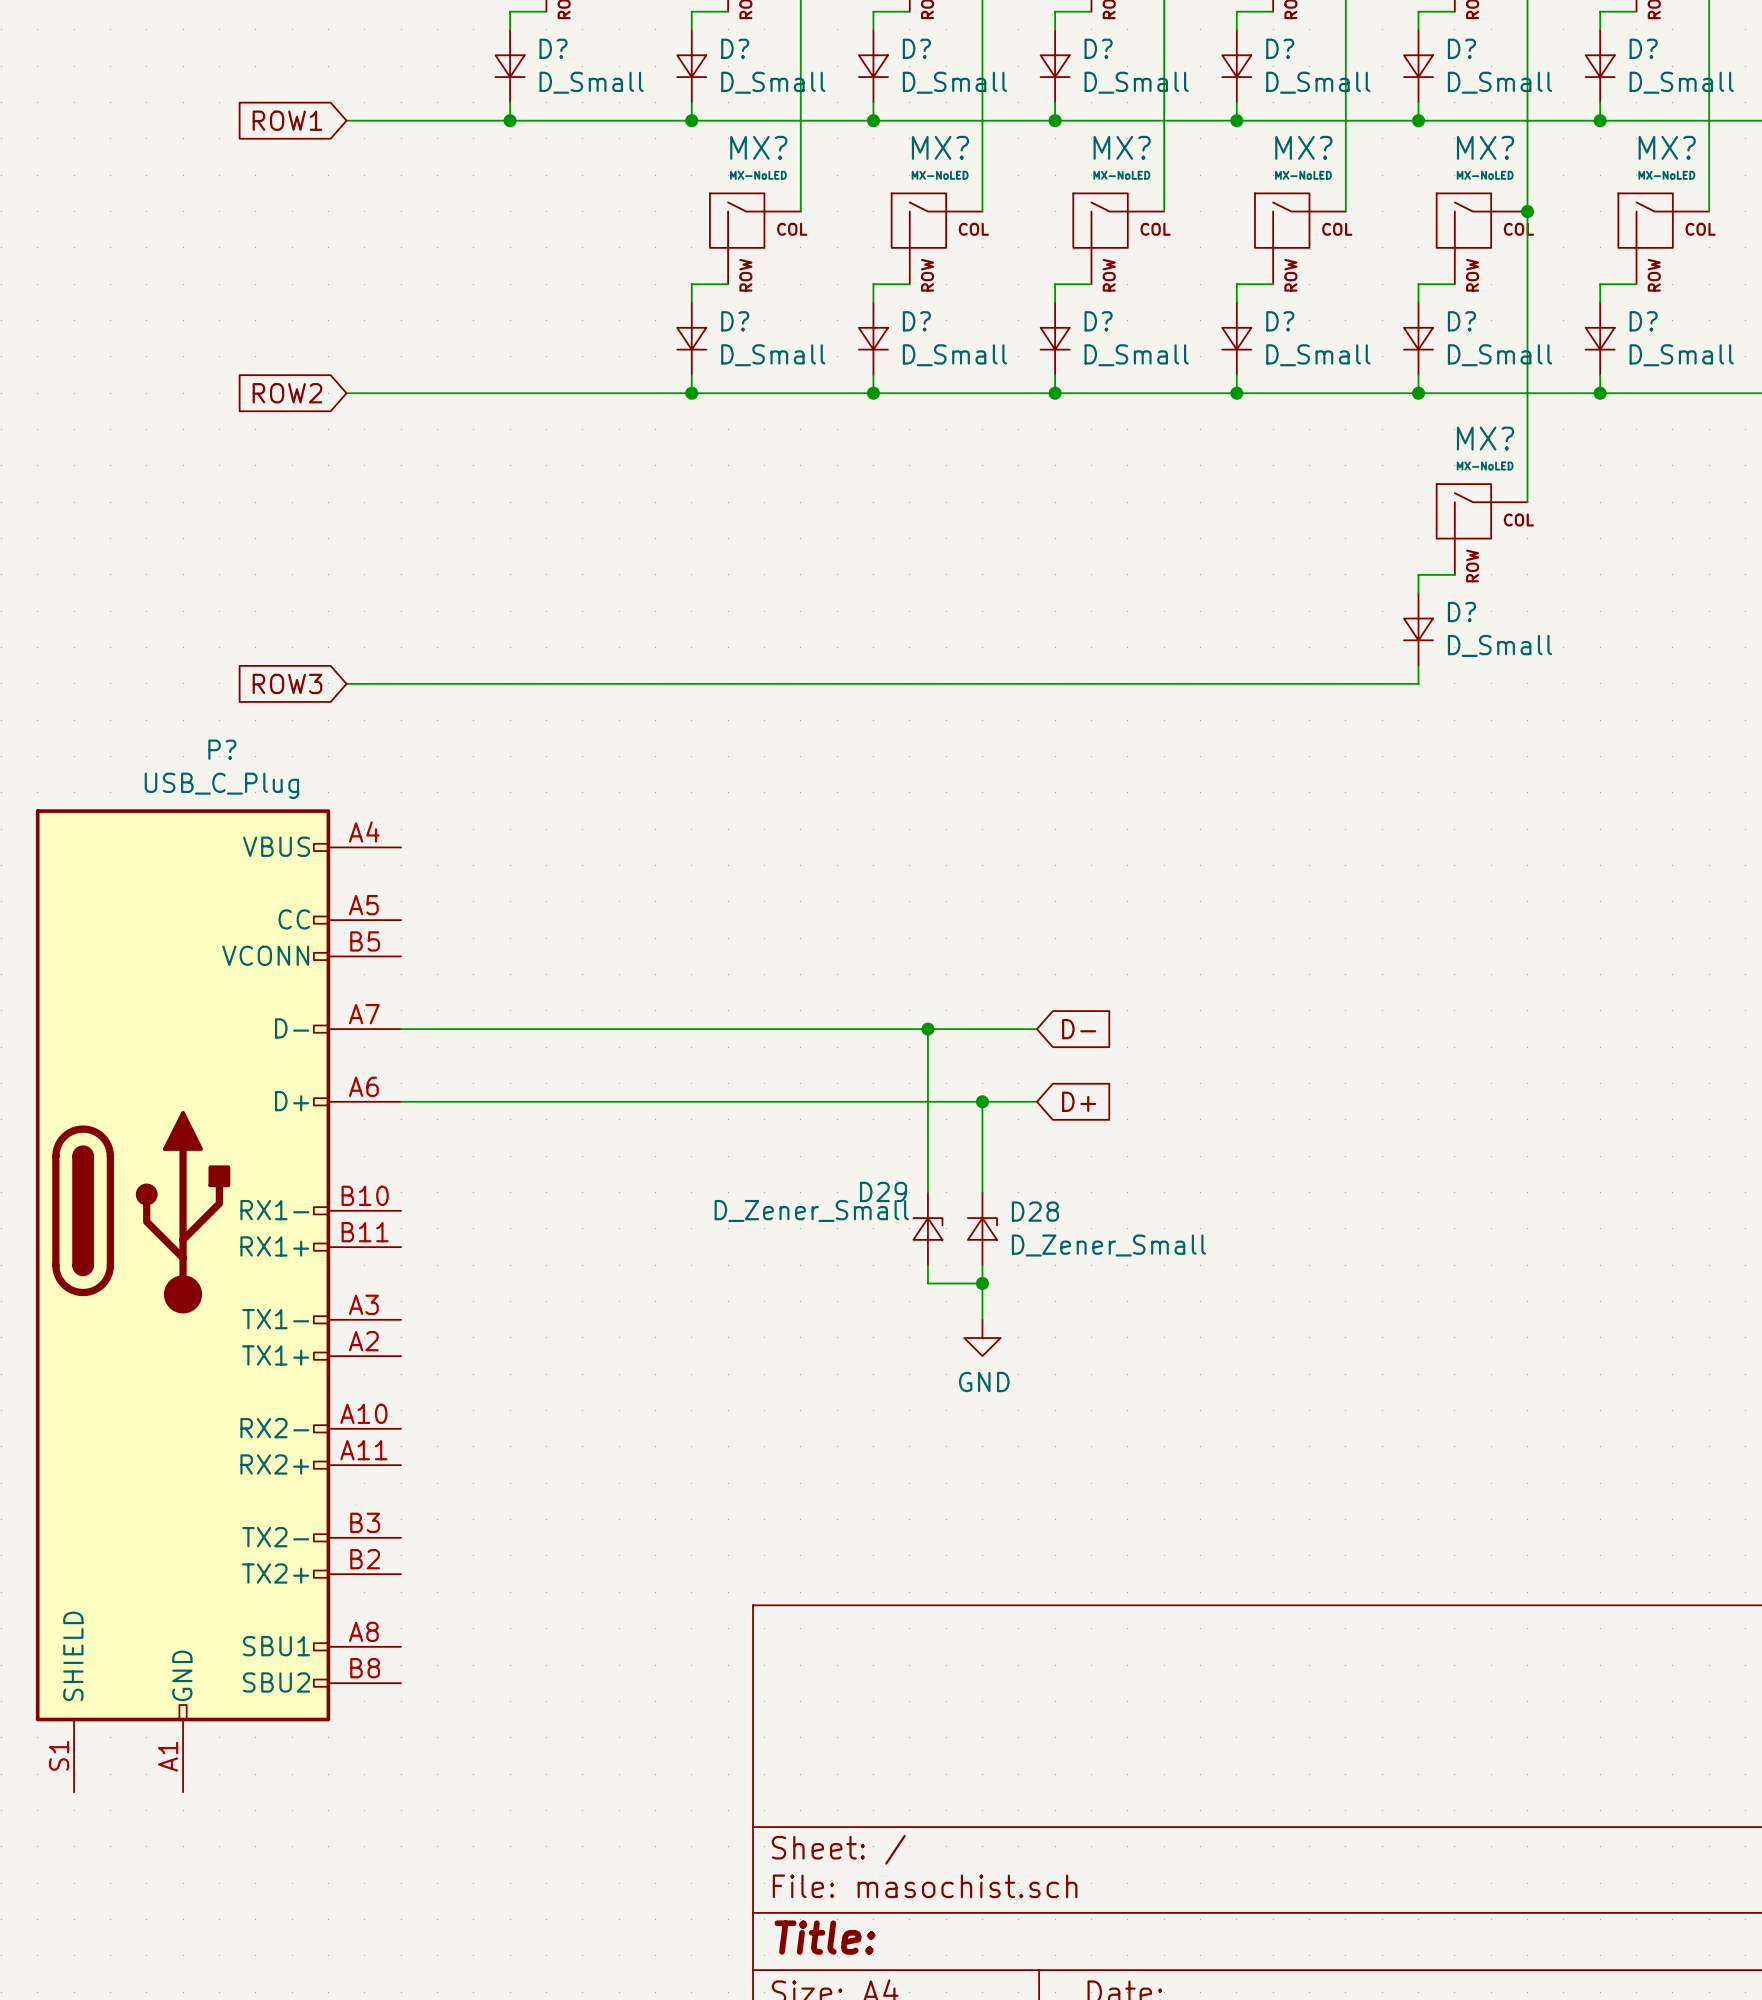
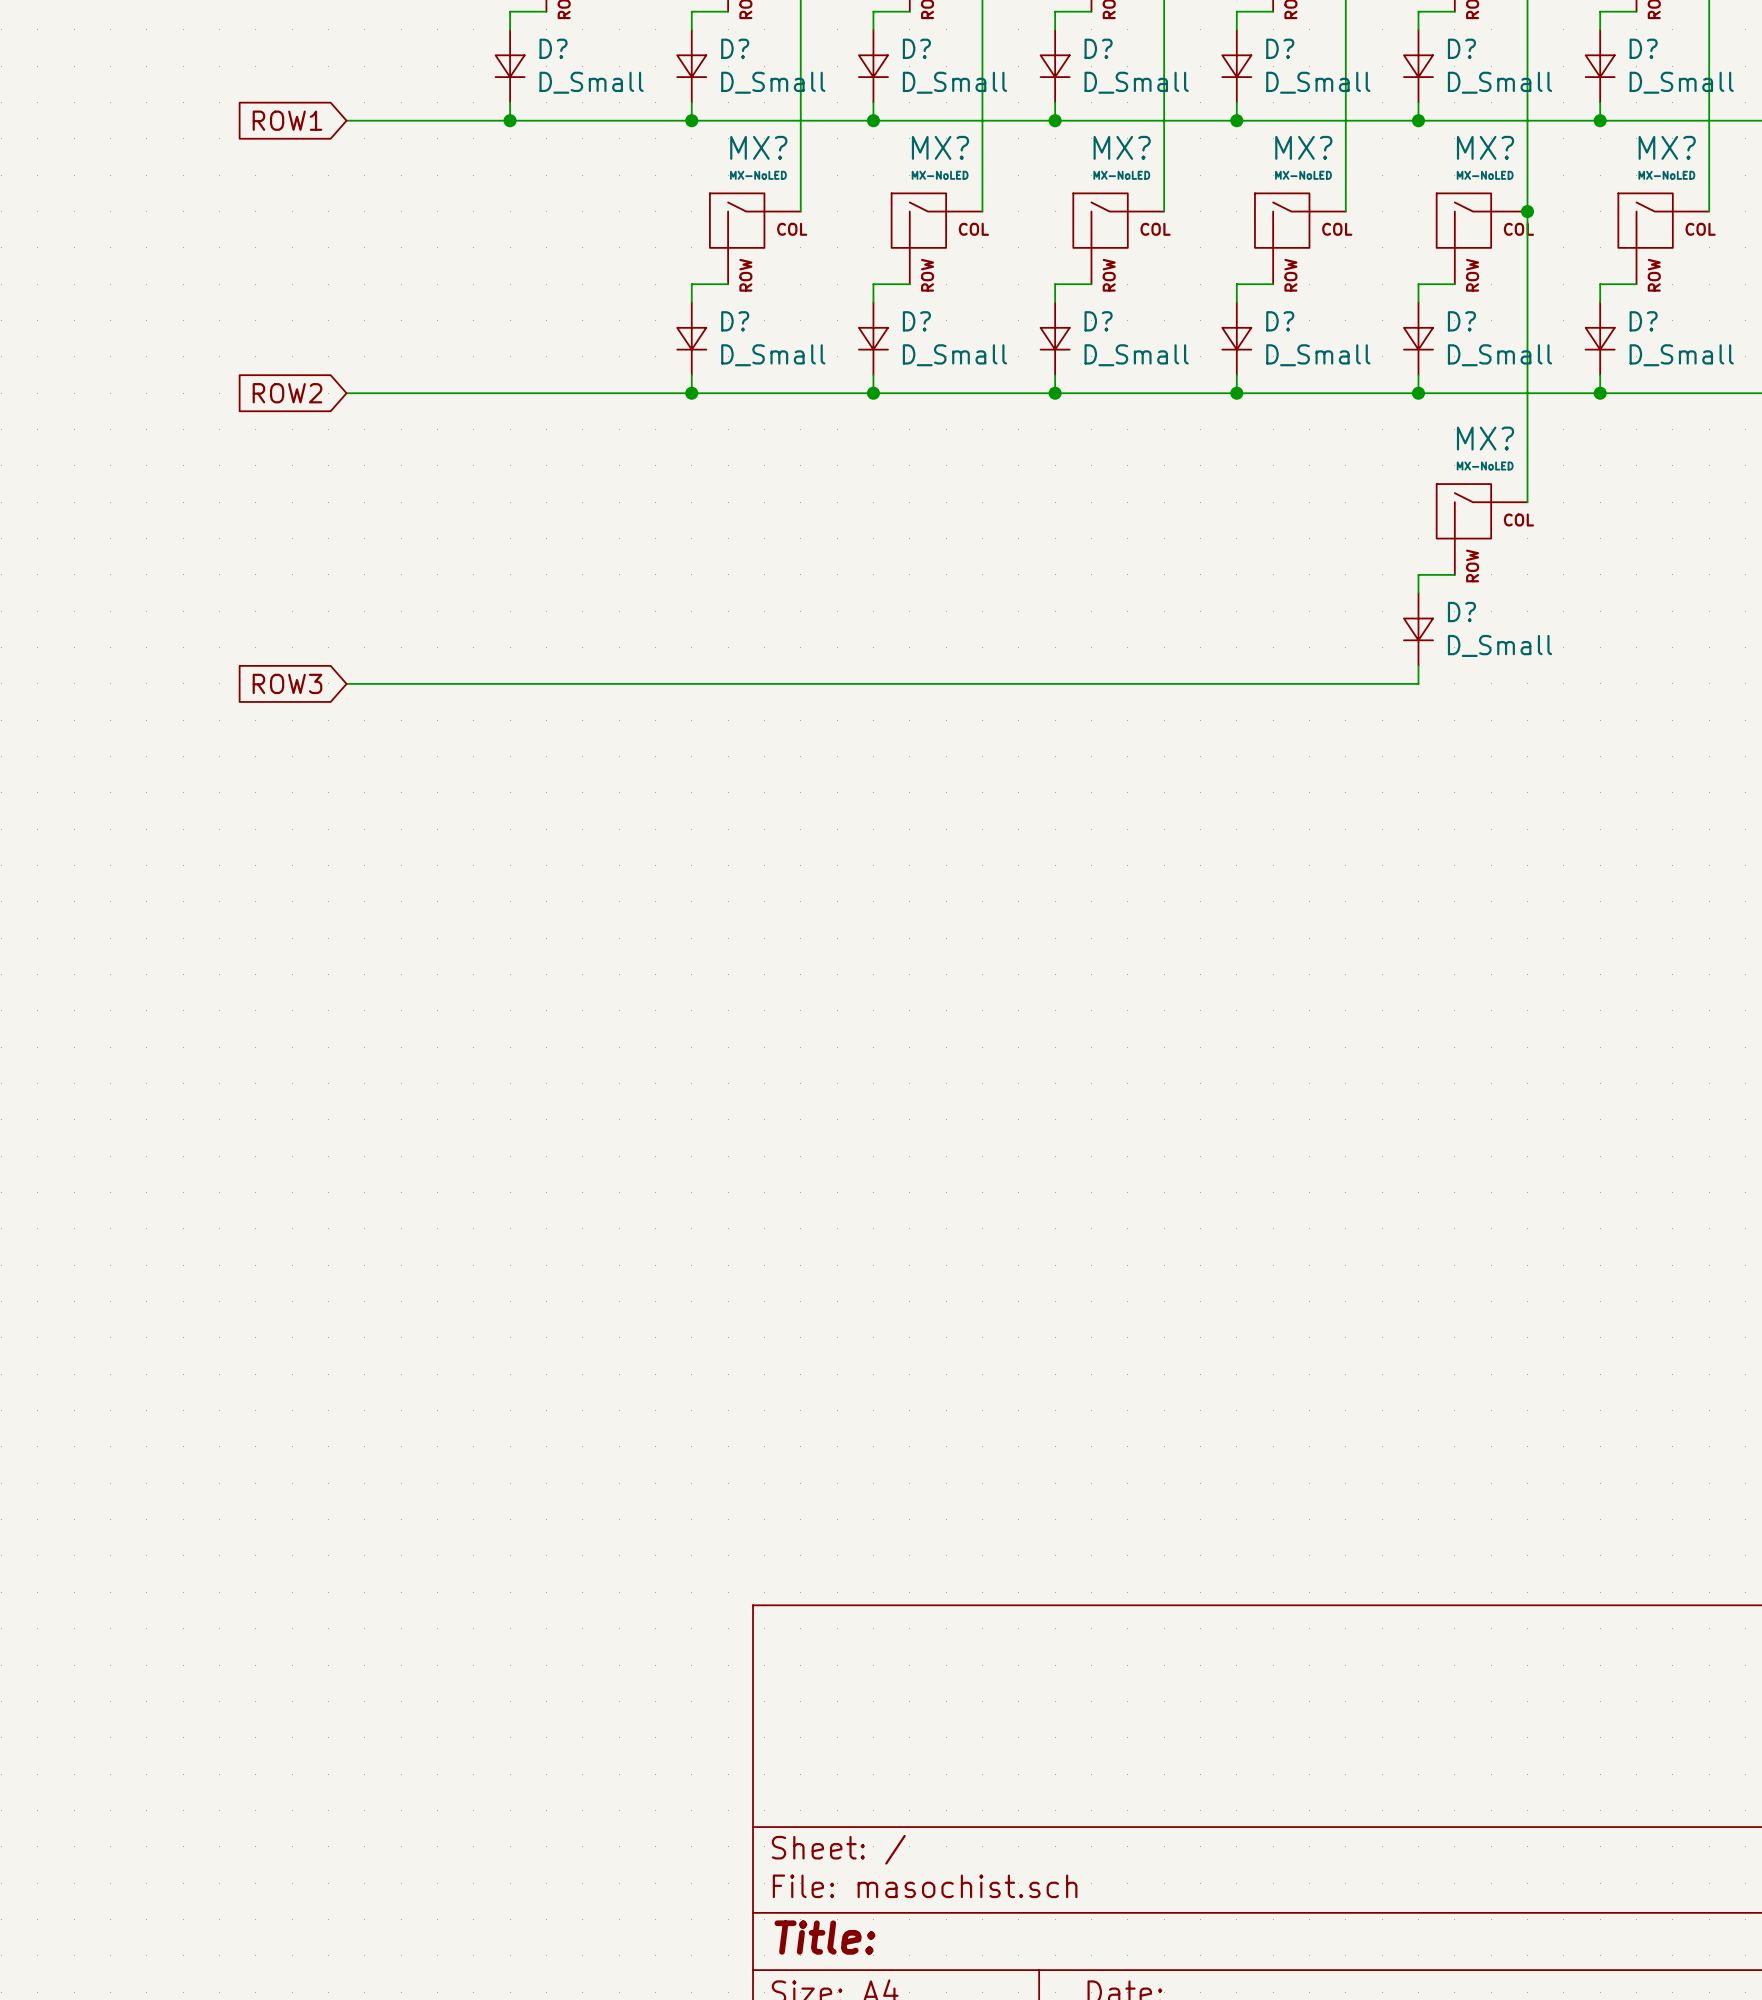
wire: (401, 1029) (1036, 1029) -> none
wire: (927, 1029) (927, 1192) -> none
junction: (927, 1029) -> none
global label: D- (1079, 1029) -> none
wire: (401, 1101) (1036, 1101) -> none
wire: (982, 1101) (982, 1192) -> none
junction: (982, 1101) -> none
global label: D+ (1079, 1101) -> none
D29: D_Zener_Small (927, 1228) -> none
D28: D_Zener_Small (982, 1228) -> none
wire: (927, 1265) (927, 1283) (982, 1283) -> none
wire: (982, 1265) (982, 1319) -> none
junction: (982, 1283) -> none
P?: USB_C_Plug (218, 1300) -> none
power symbol: GND (982, 1337) -> none

